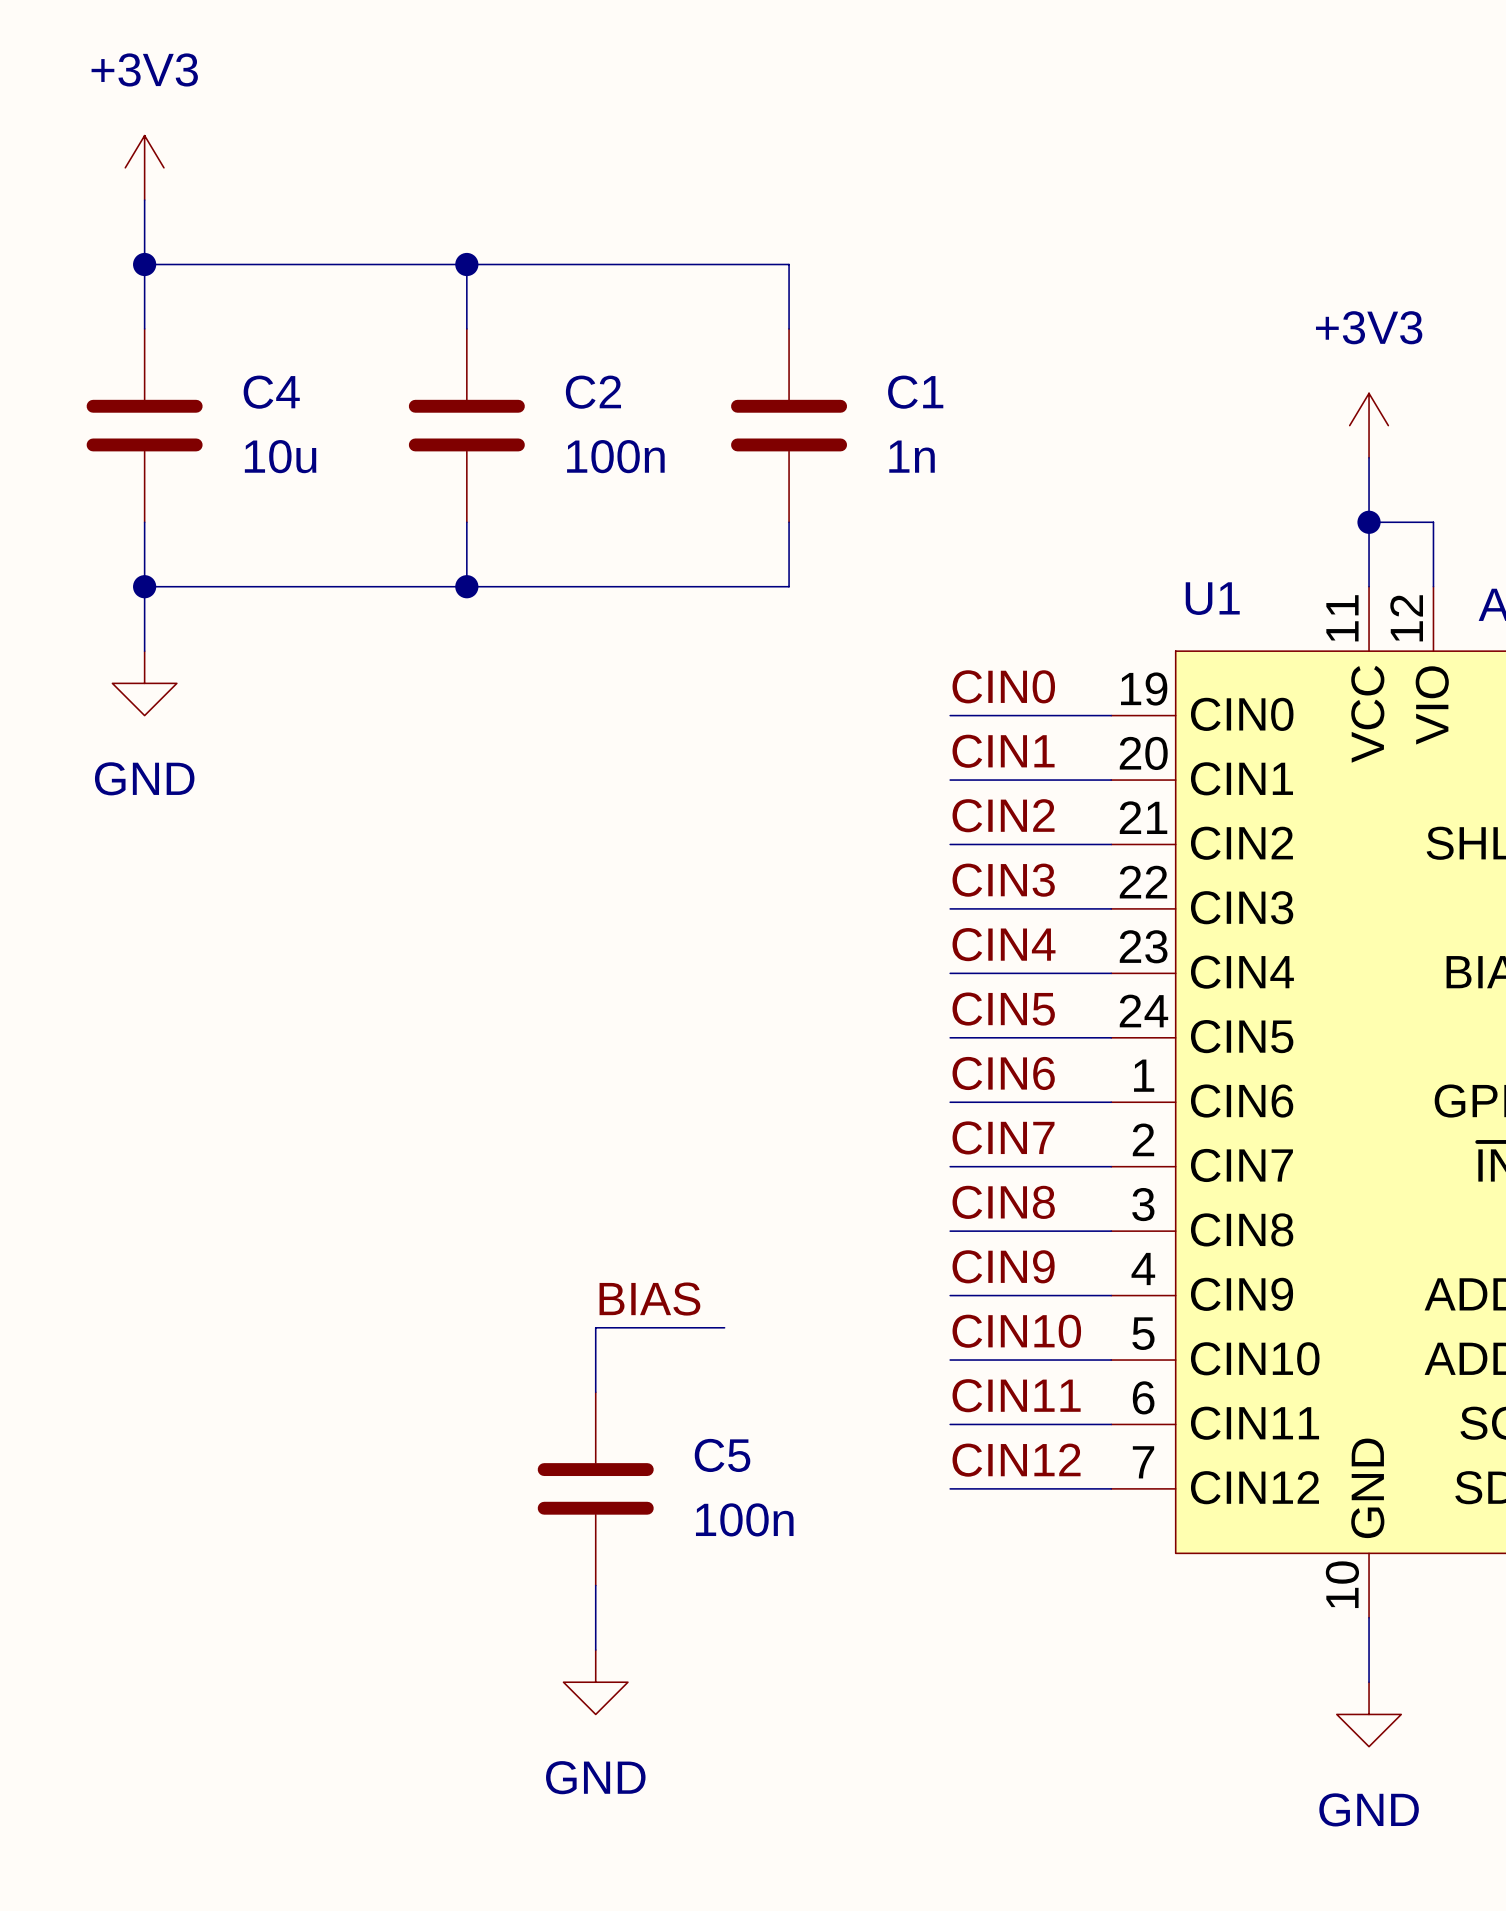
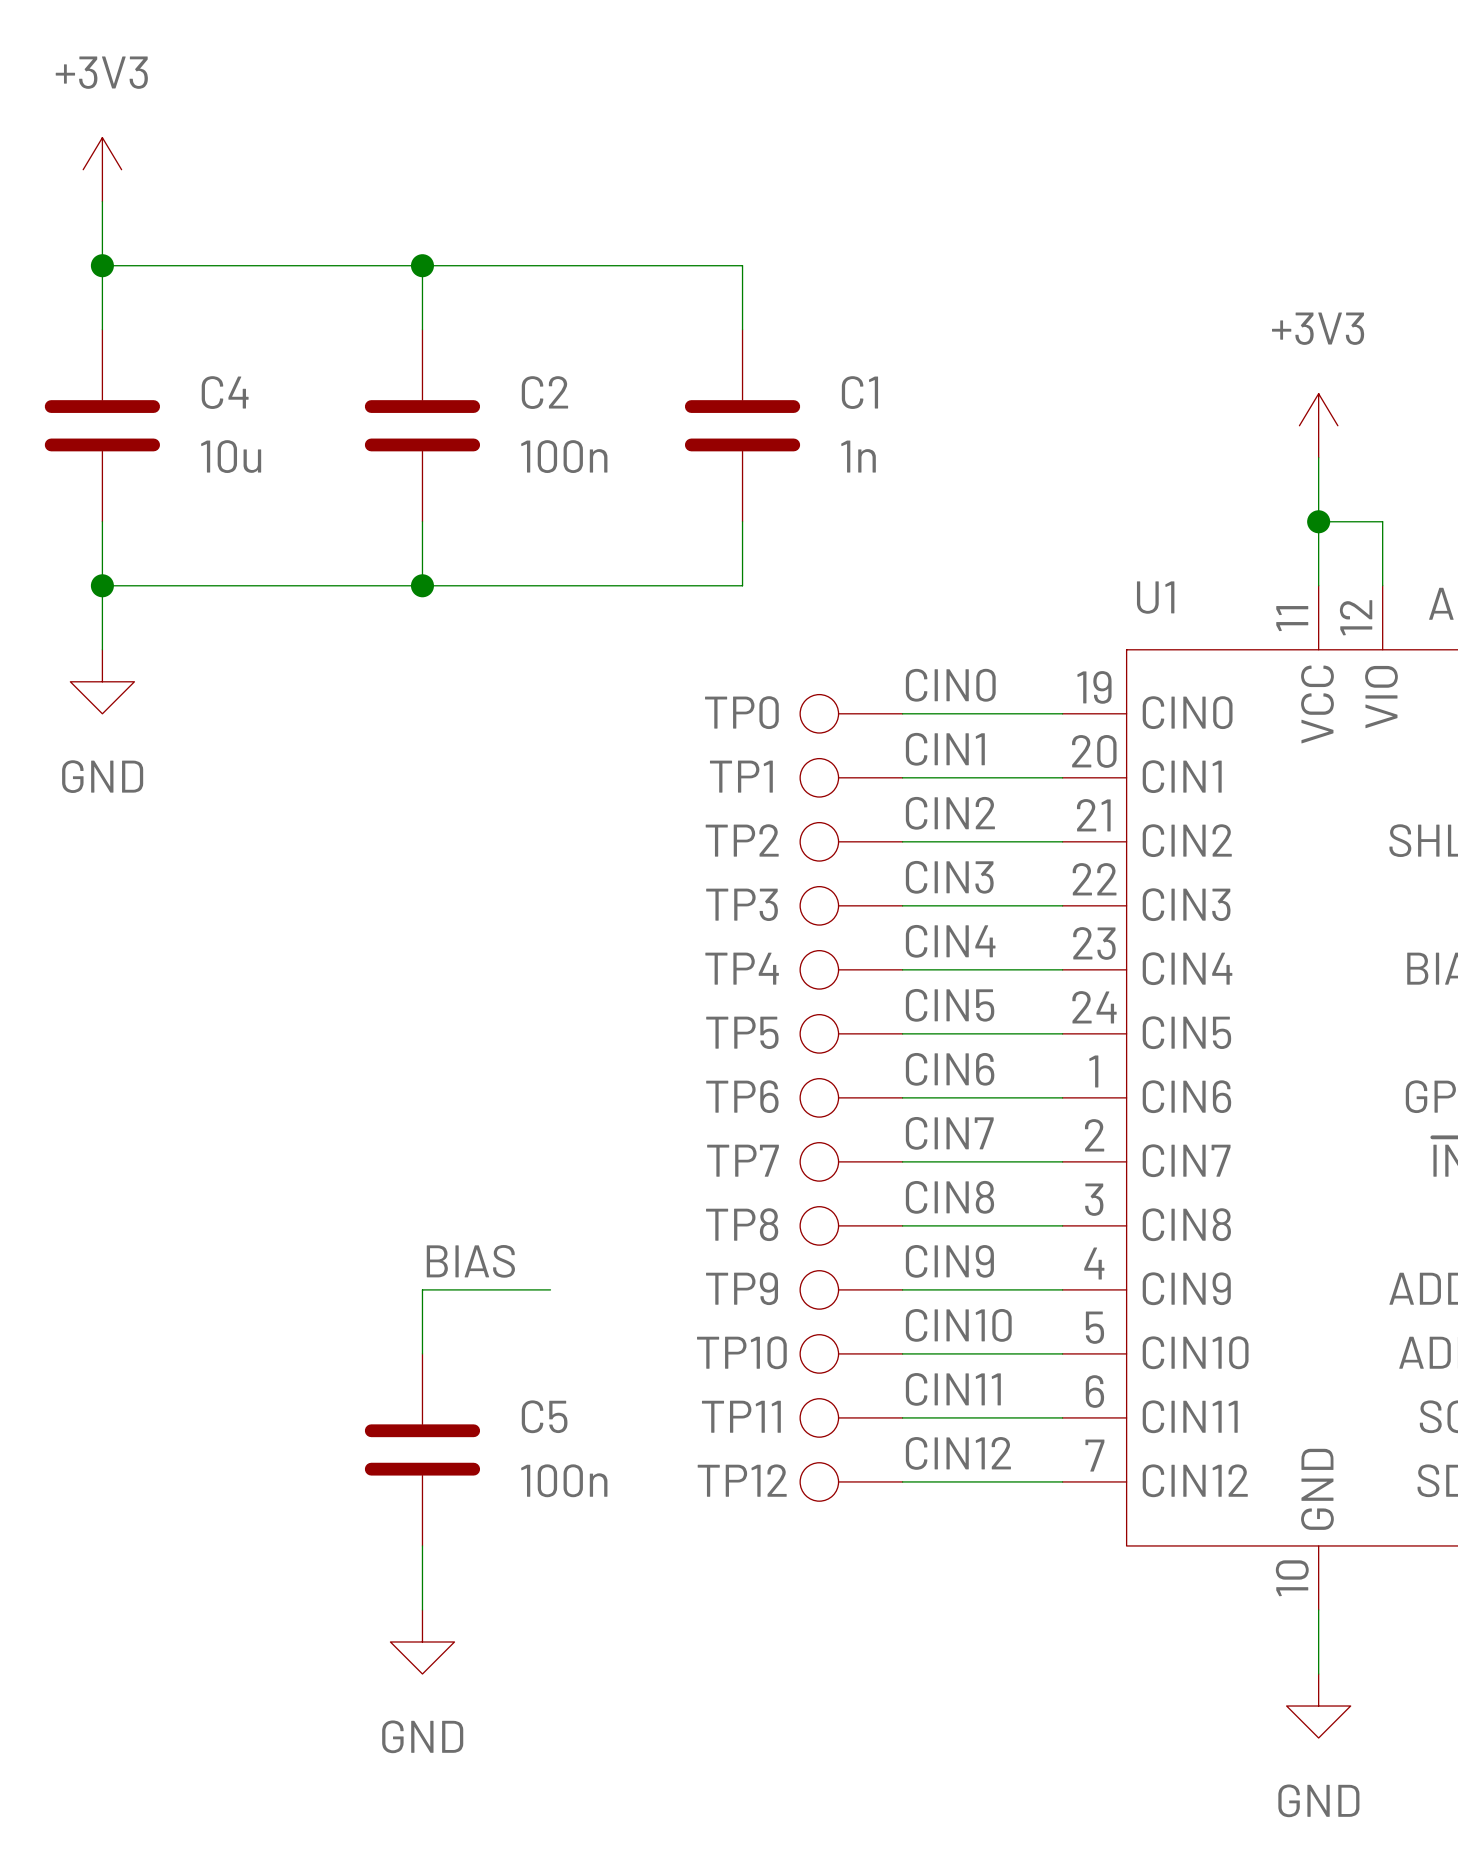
TP0: none -> (851, 713)
TP1: none -> (851, 777)
TP2: none -> (851, 841)
TP3: none -> (851, 905)
TP4: none -> (851, 969)
TP5: none -> (851, 1033)
TP6: none -> (851, 1097)
TP7: none -> (851, 1161)
TP8: none -> (851, 1225)
TP9: none -> (851, 1289)
label position: BIAS (649, 1299) -> BIAS (470, 1261)
wire: (724, 1327) (595, 1327) (595, 1392) -> (550, 1289) (422, 1289) (422, 1353)
TP10: none -> (851, 1353)
TP11: none -> (851, 1417)
C5 position: (595, 1488) -> (422, 1449)
TP12: none -> (851, 1481)
wire: (595, 1585) (595, 1650) -> (422, 1545) (422, 1609)
power symbol position: GND (595, 1682) -> GND (422, 1641)

